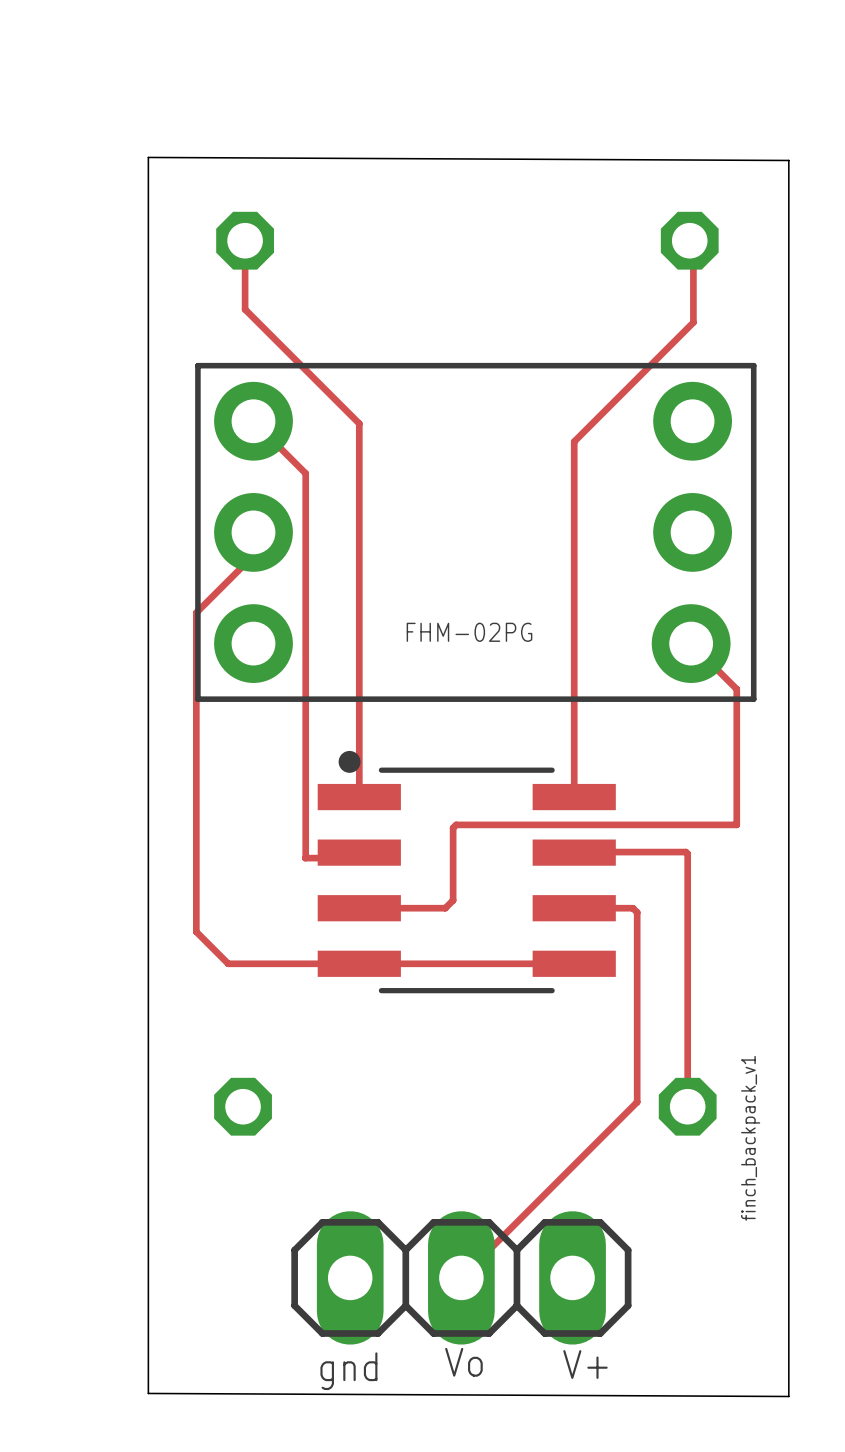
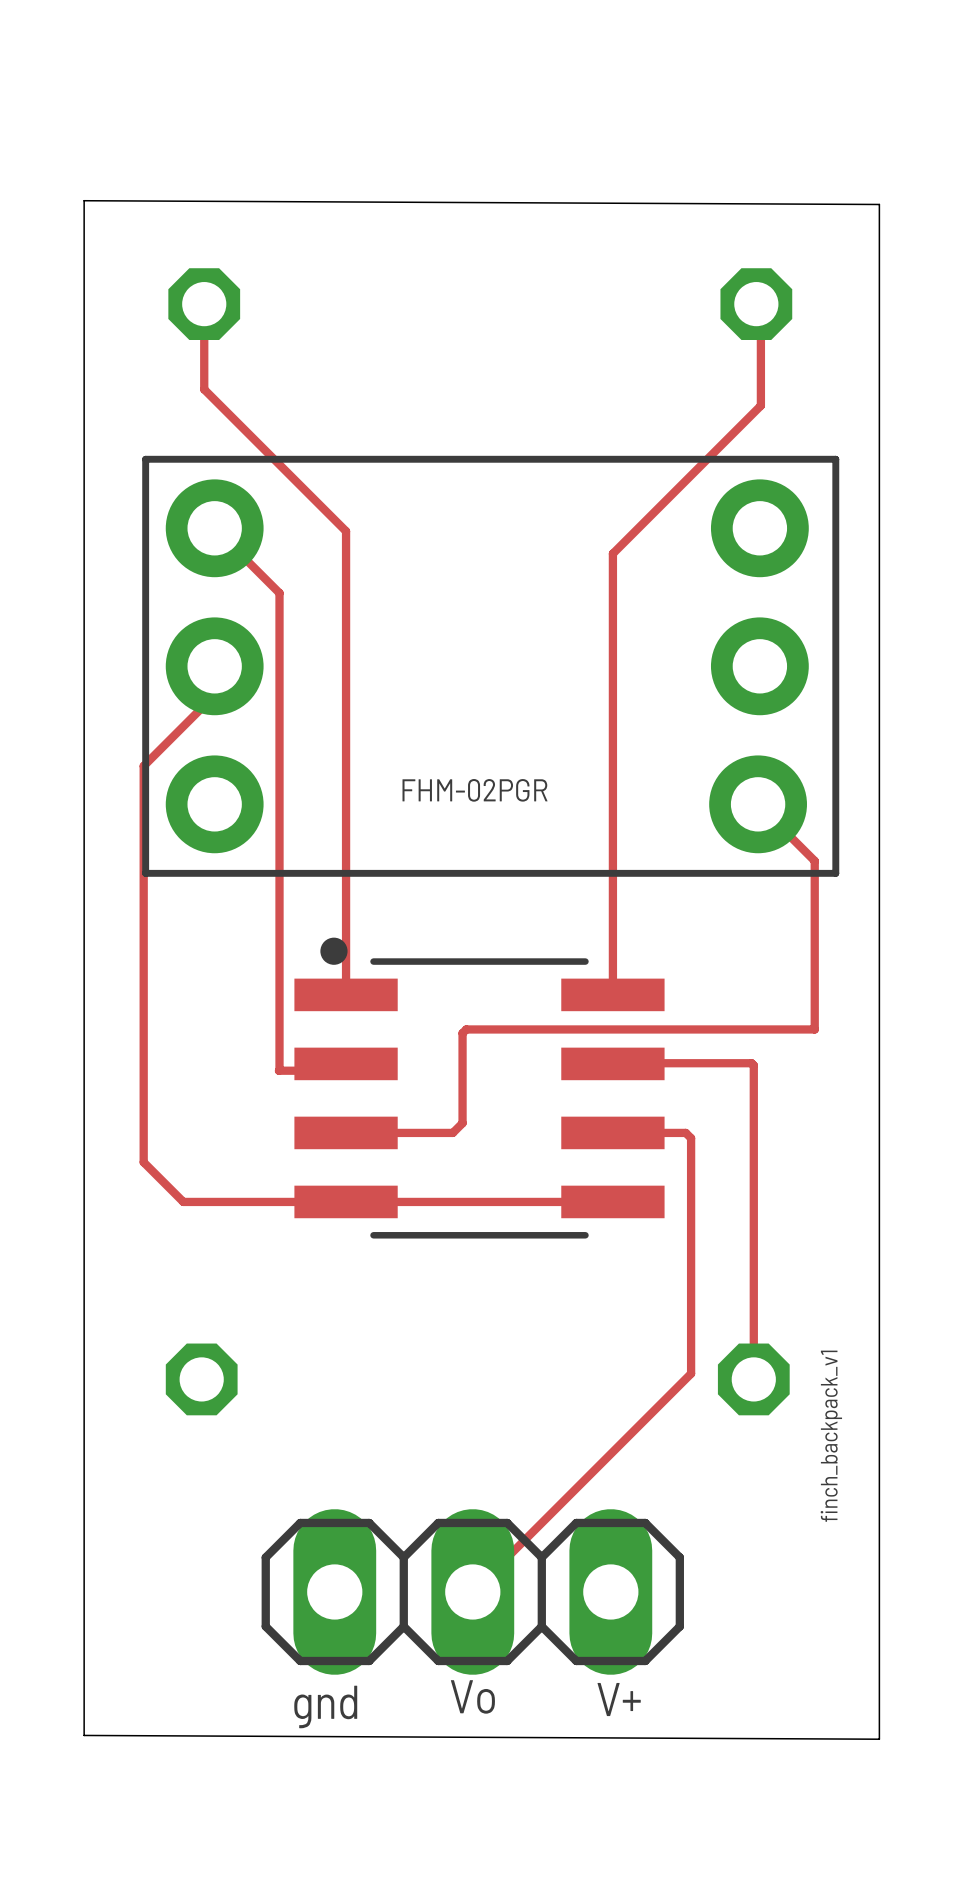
part value: FHM-02PG (469, 632) -> FHM-02PGR (474, 790)

